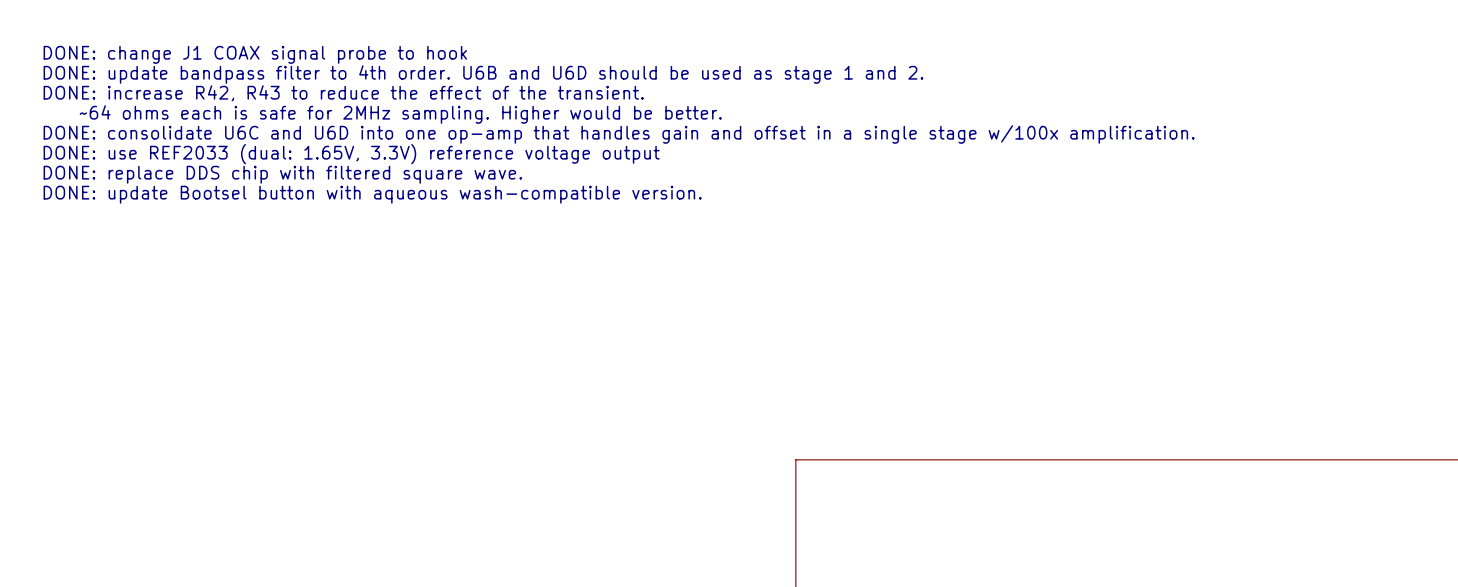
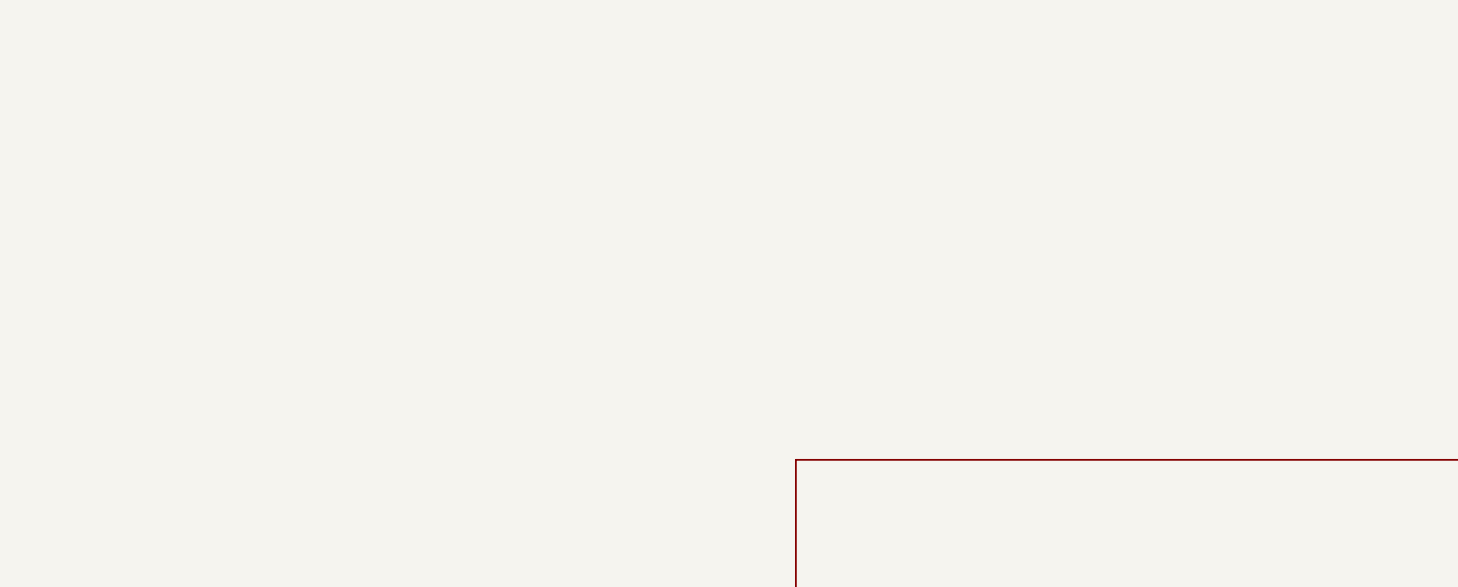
text: DONE: change J1 COAX signal probe to hook (255, 54) -> none
text: DONE: update bandpass filter to 4th order. U6B and U6D should be used as stage 1 and 2. (483, 74) -> none
text: DONE: increase R42, R43 to reduce the effect of the transient. (343, 93) -> none
text: ~64 ohms each is safe for 2MHz sampling. Higher would be better. (400, 114) -> none
text: DONE: consolidate U6C and U6D into one op-amp that handles gain and offset in a single stage w/100x amplification. (619, 134) -> none
text: DONE: use REF2033 (dual: 1.65V, 3.3V) reference voltage output (351, 154) -> none
text: DONE: replace DDS chip with filtered square wave. (282, 174) -> none
text: DONE: update Bootsel button with aqueous wash-compatible version. (372, 194) -> none

